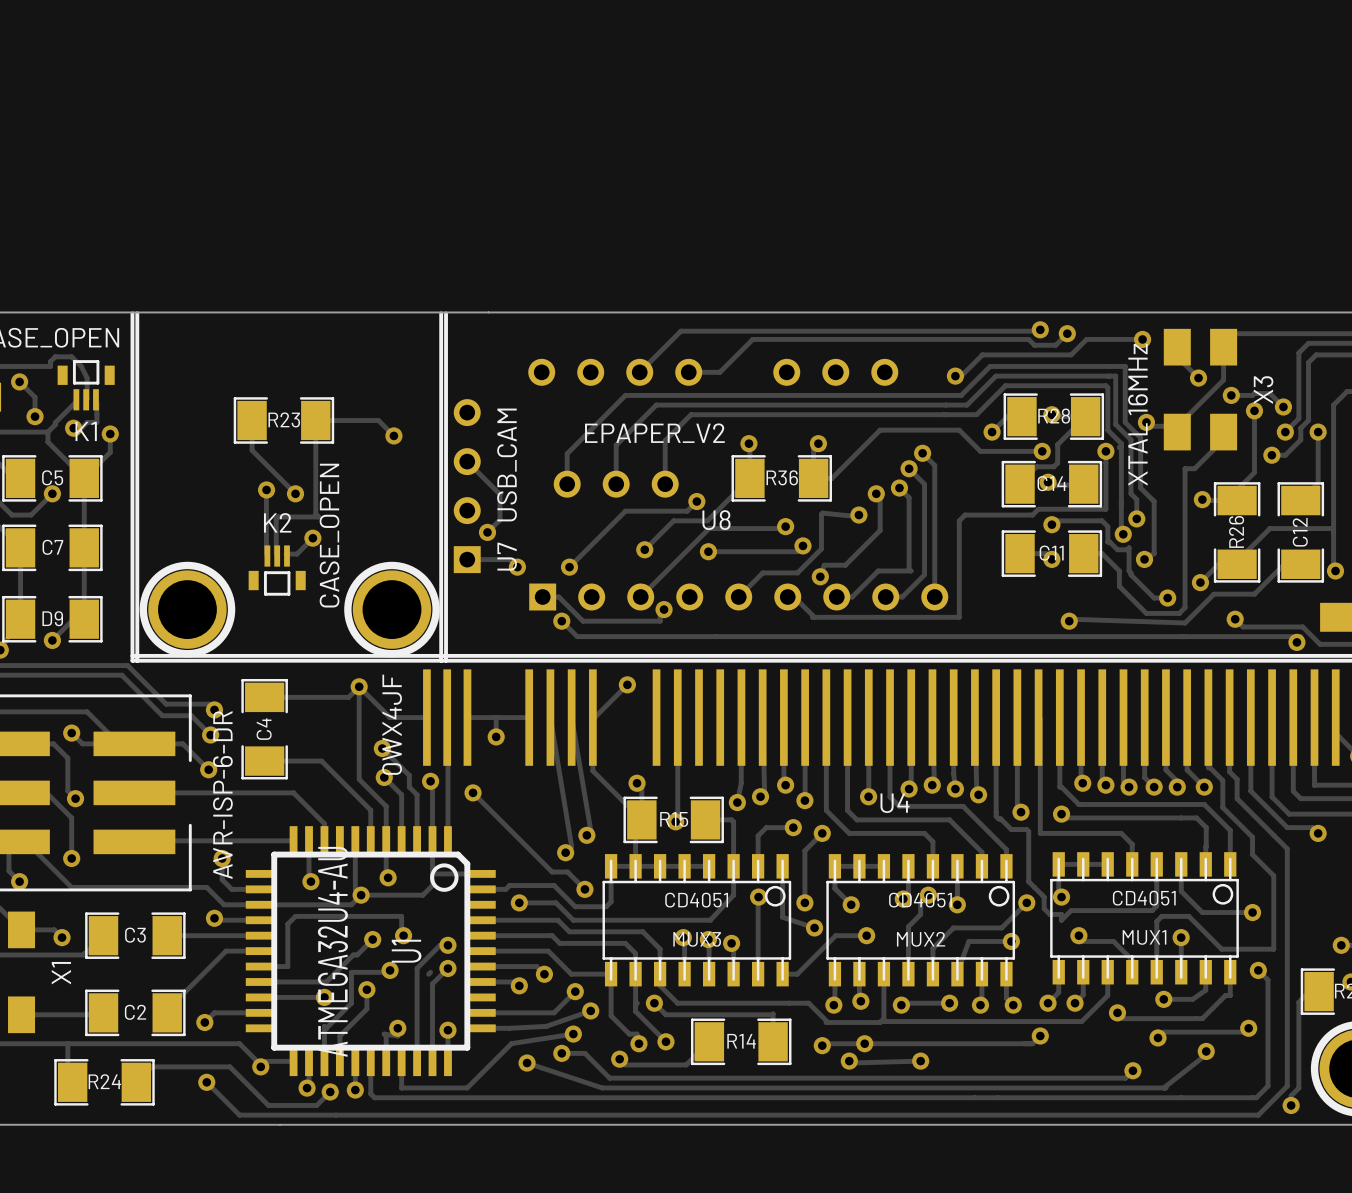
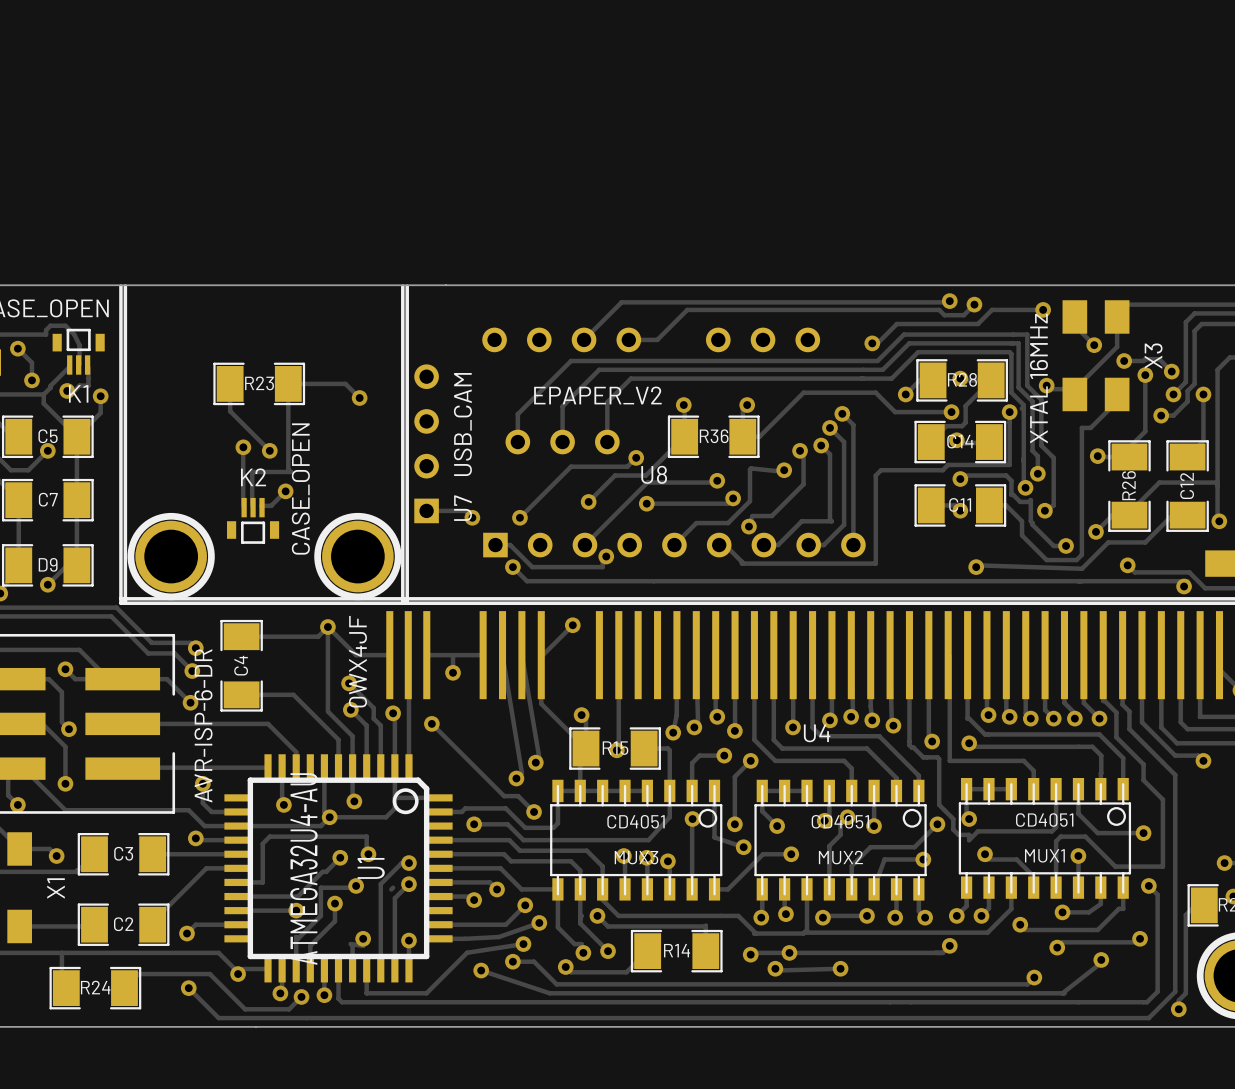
track: (467, 461) (500, 494) (500, 519) (487, 532) -> none
via: (487, 532) -> none

